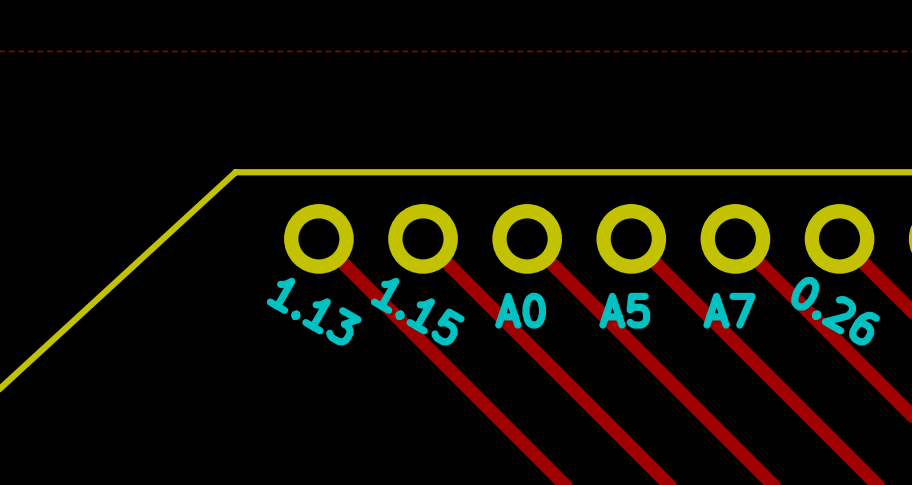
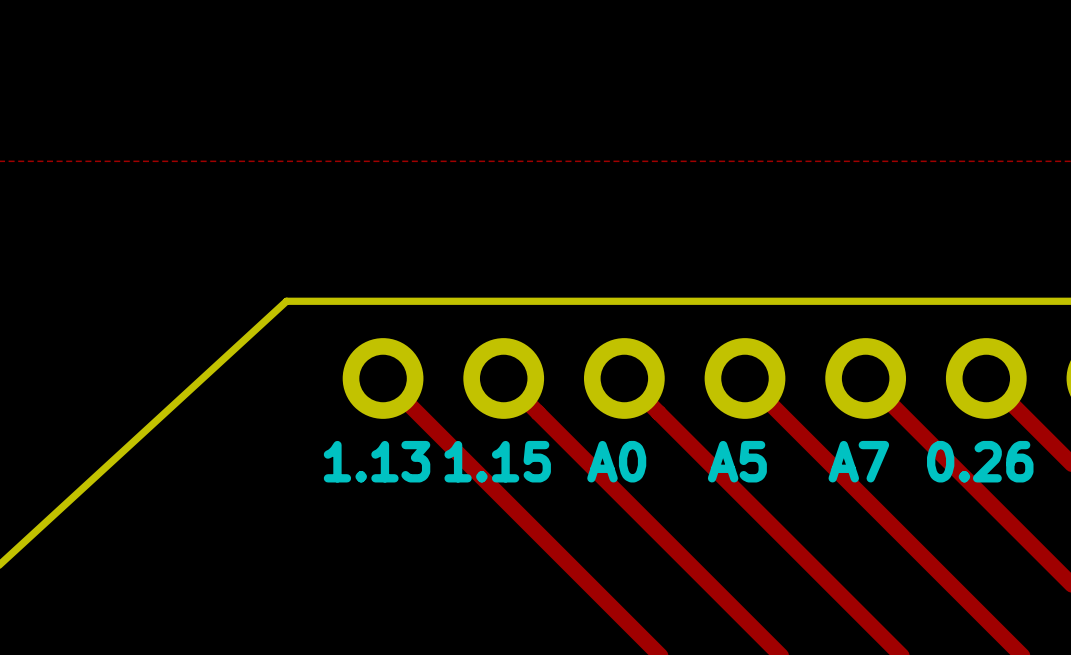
text rotation: 0° (314, 311) -> 30° counterclockwise (377, 461)
text rotation: 0° (417, 311) -> 30° counterclockwise (497, 461)
text rotation: 0° (835, 311) -> 30° counterclockwise (980, 461)

